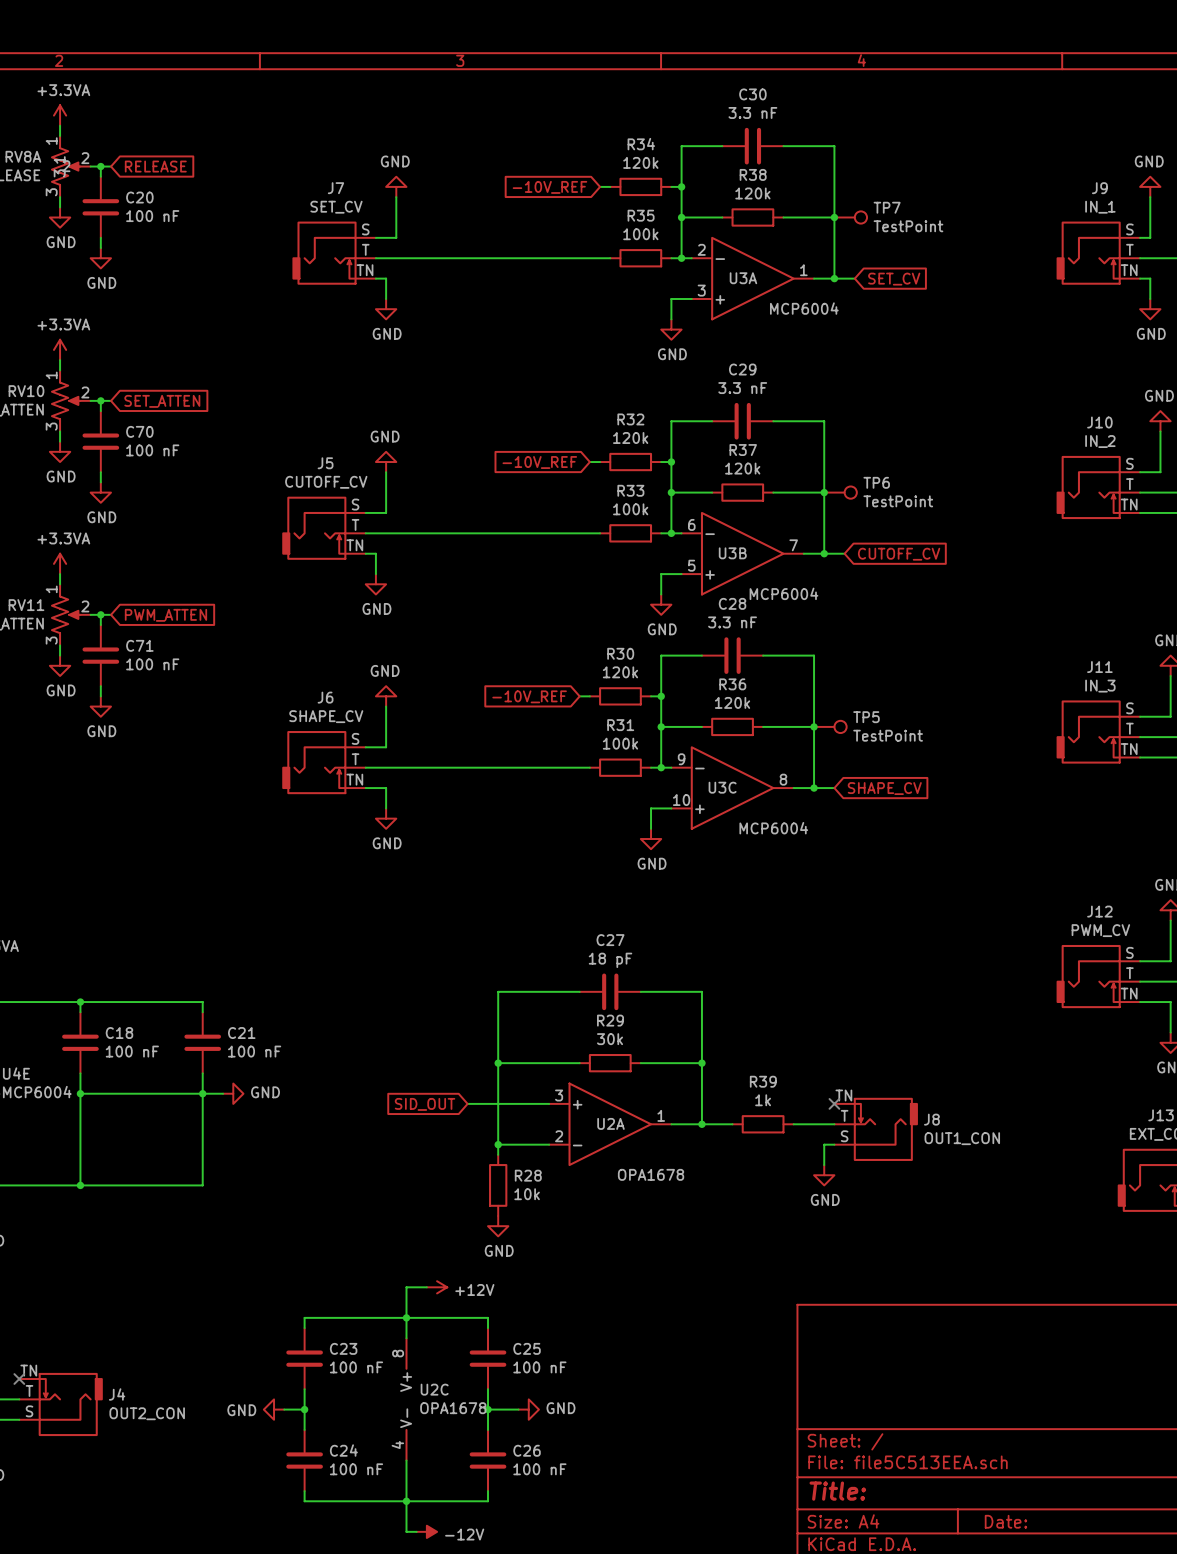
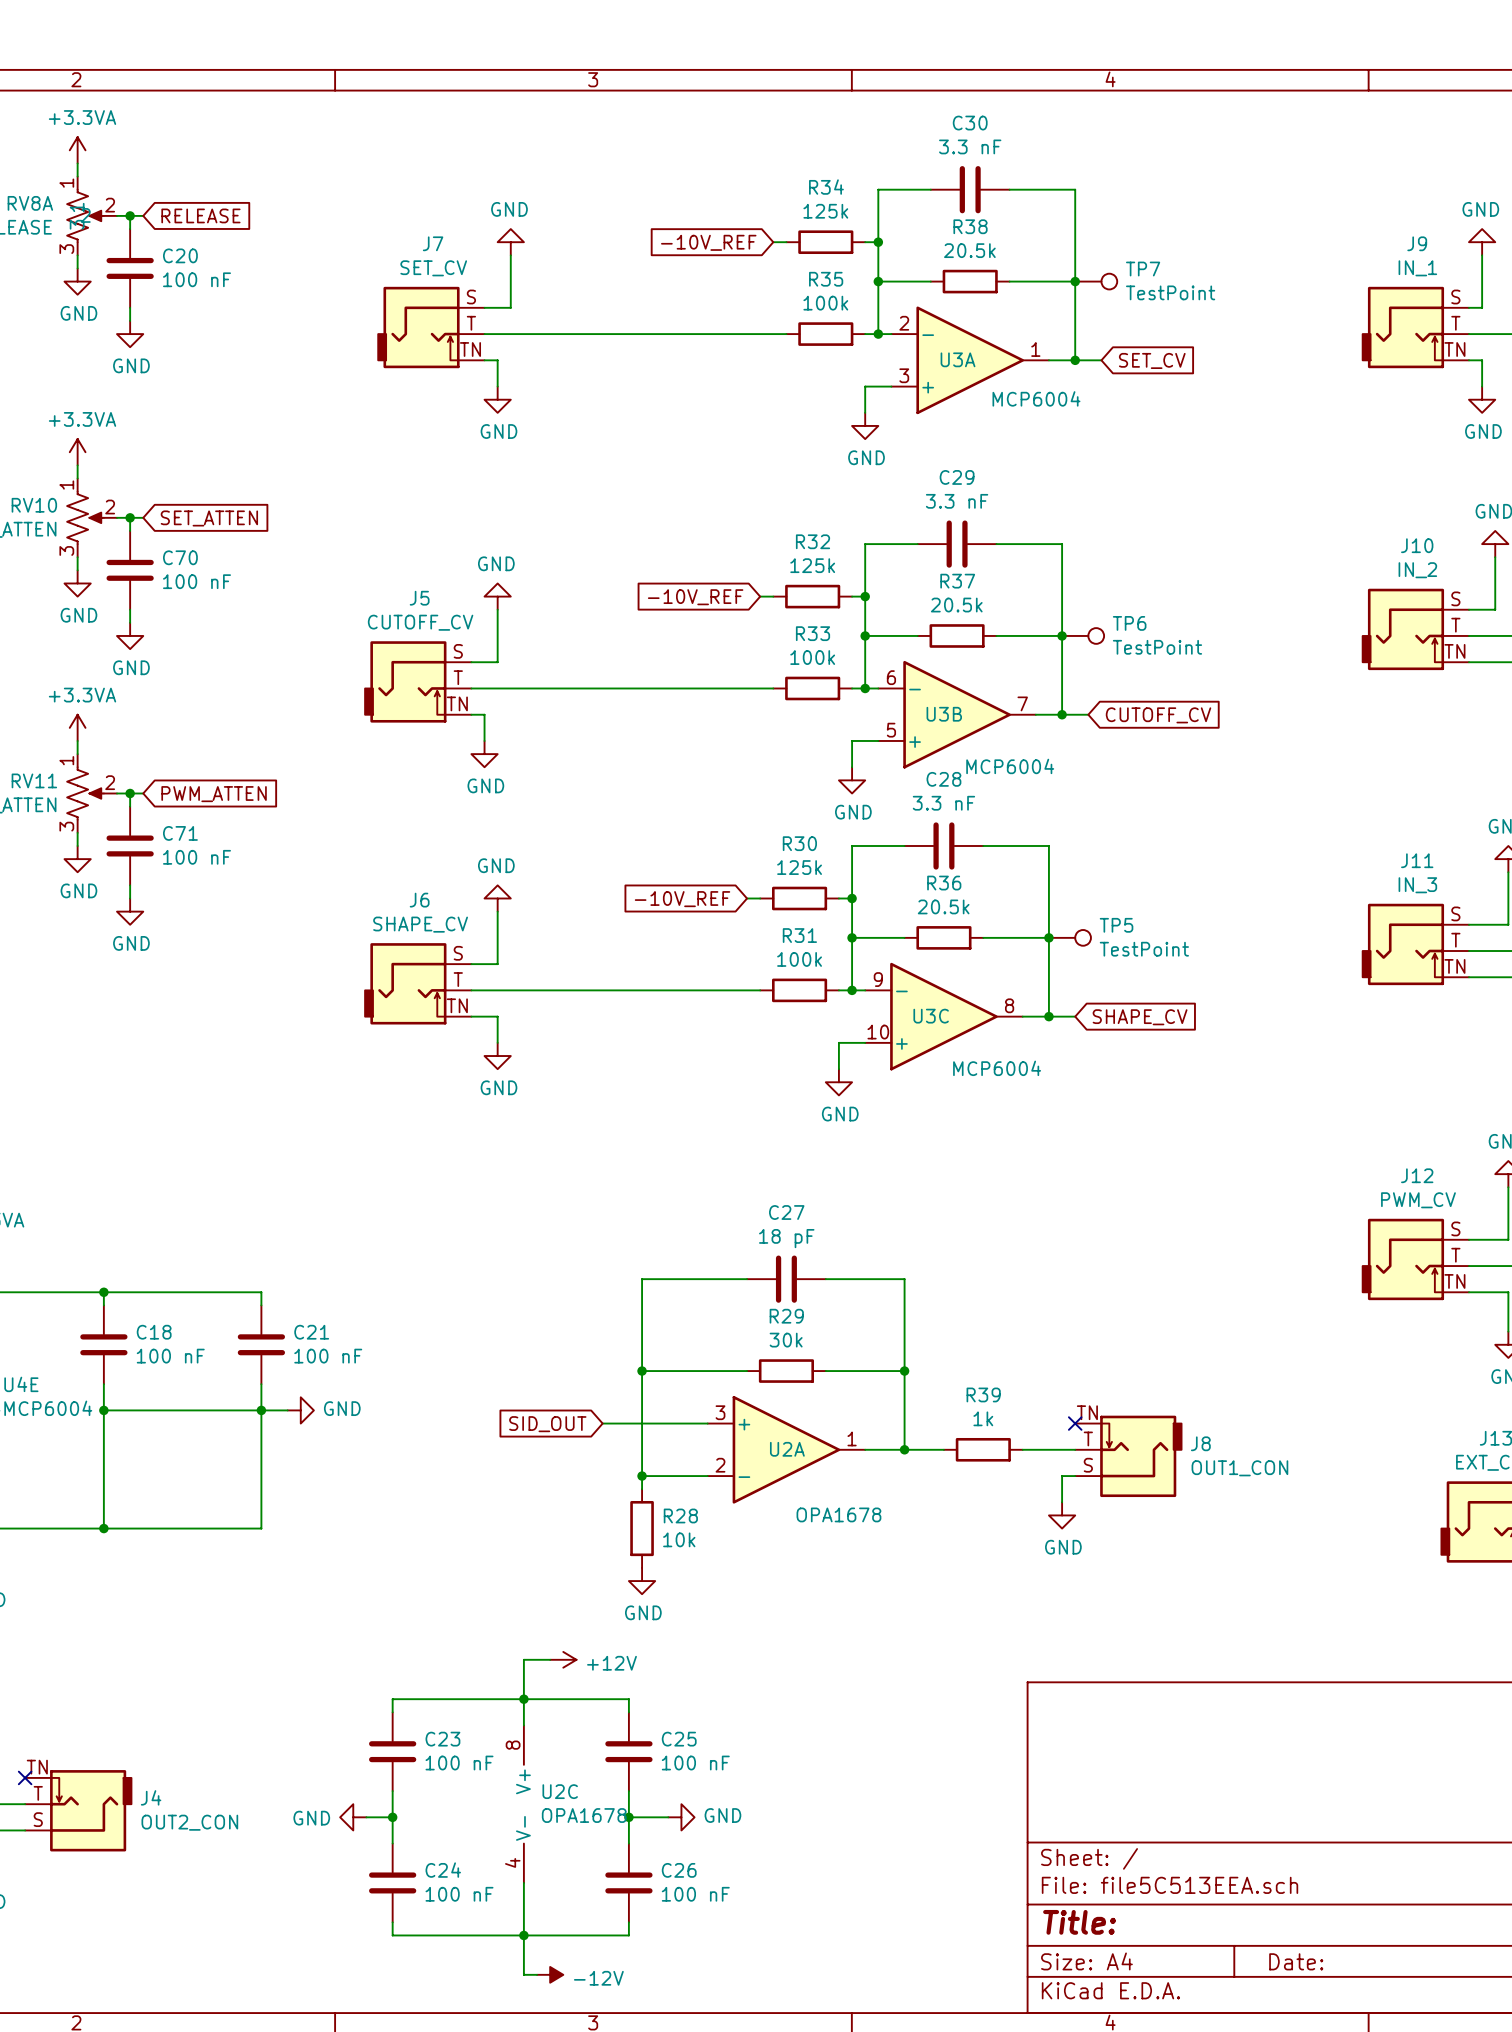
R34 value: 120k (640, 162) -> 125k (825, 211)
R38 value: 120k (752, 193) -> 20.5k (969, 250)
R32 value: 120k (630, 438) -> 125k (812, 565)
R37 value: 120k (742, 468) -> 20.5k (956, 605)
R30 value: 120k (620, 672) -> 125k (799, 867)
R36 value: 120k (732, 702) -> 20.5k (943, 906)

